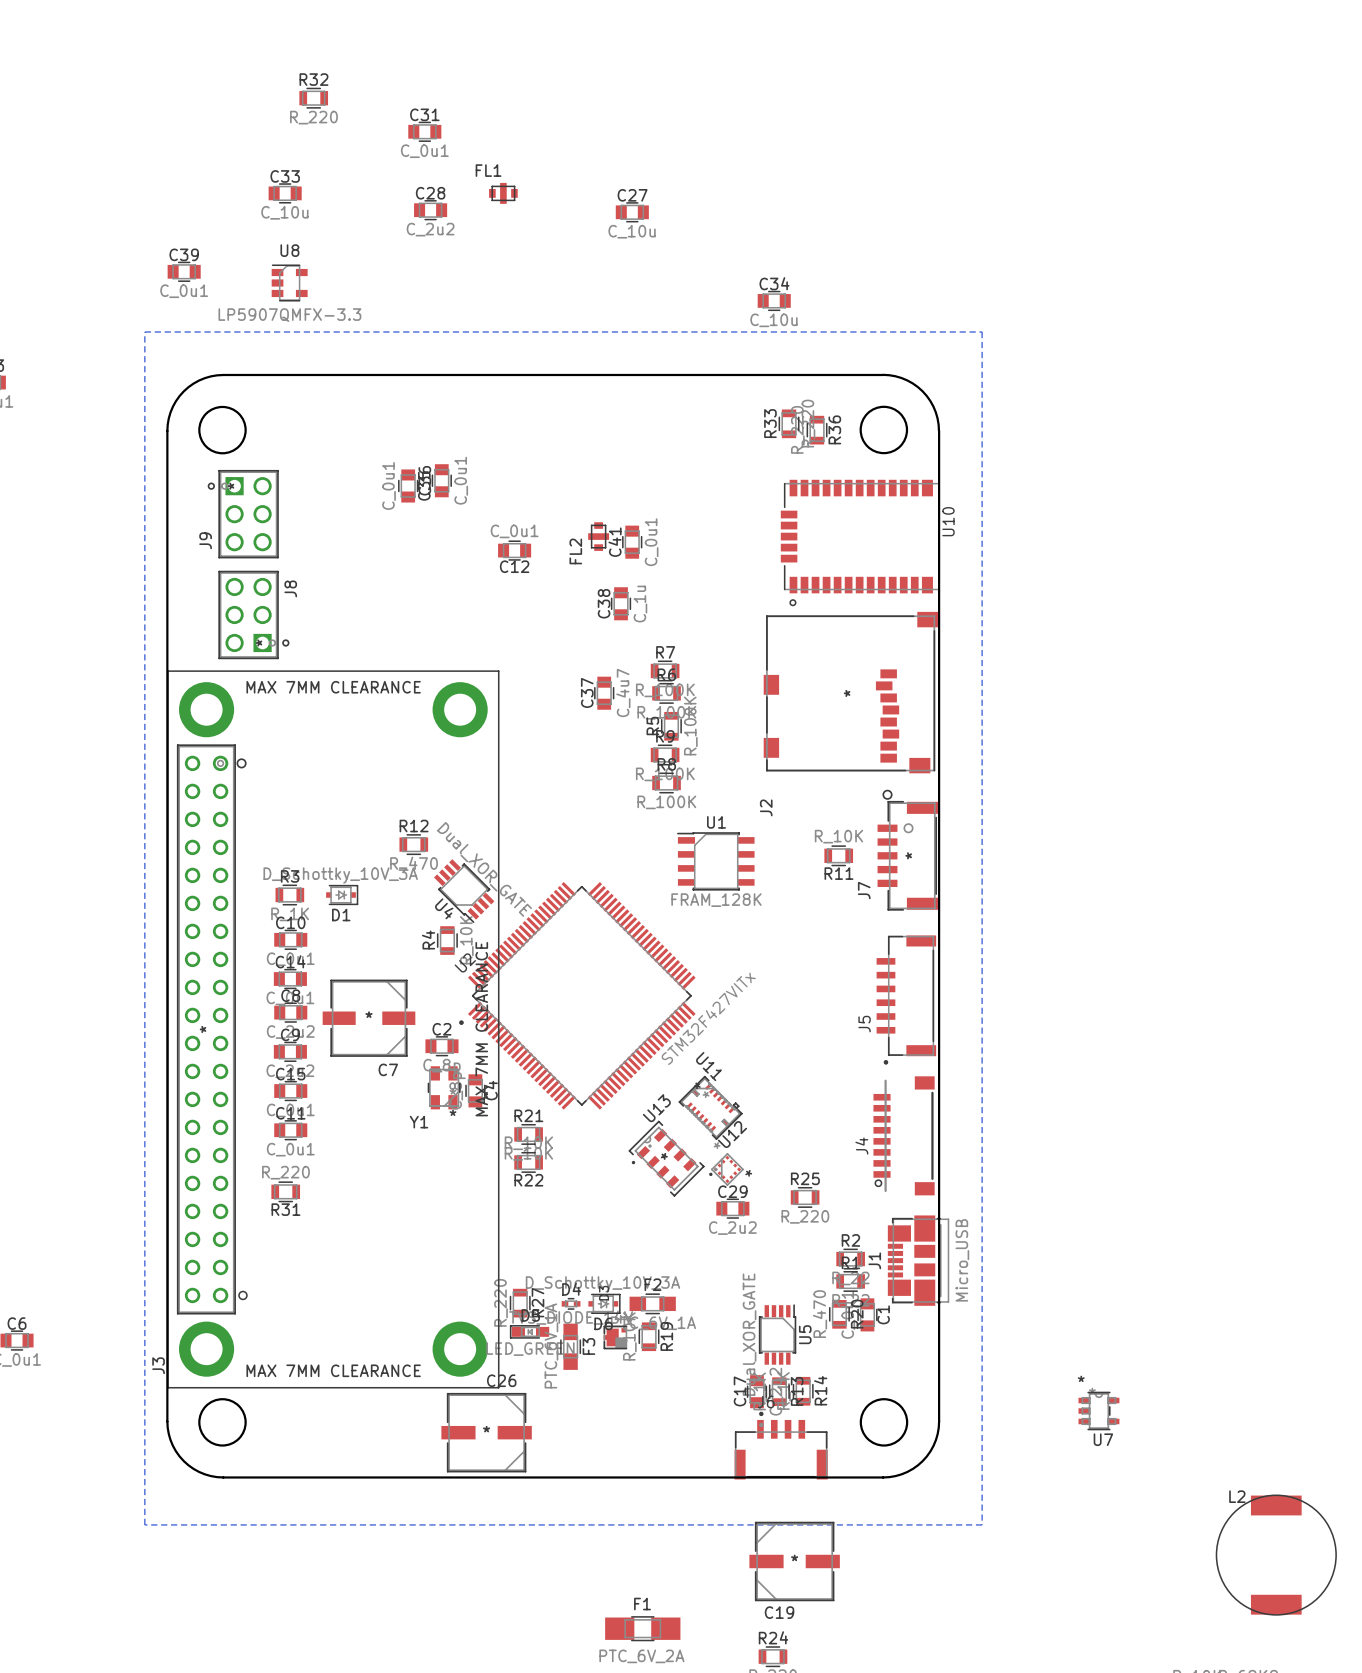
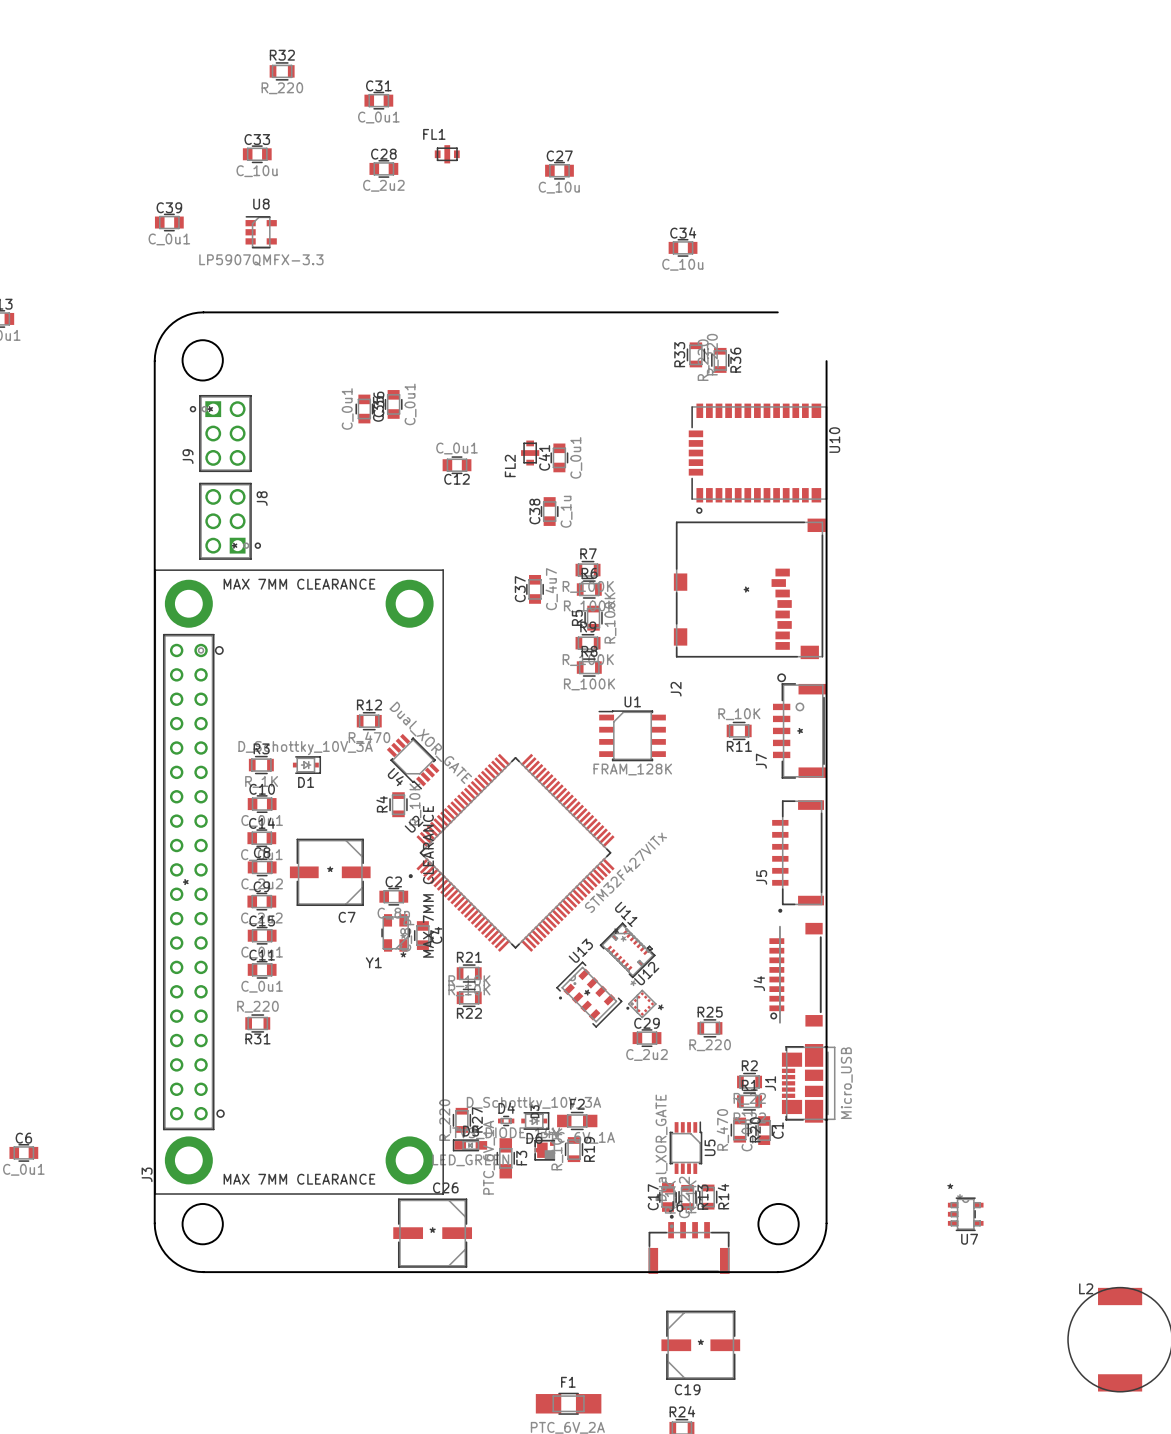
bottom zone outline: (144, 332) (144, 1524) (982, 1524) (982, 332) (144, 332) -> none
board edge: (882, 374) (907, 380) (922, 391) (935, 412) (938, 430) -> none
round board edge: [859, 405, 909, 455] -> none

